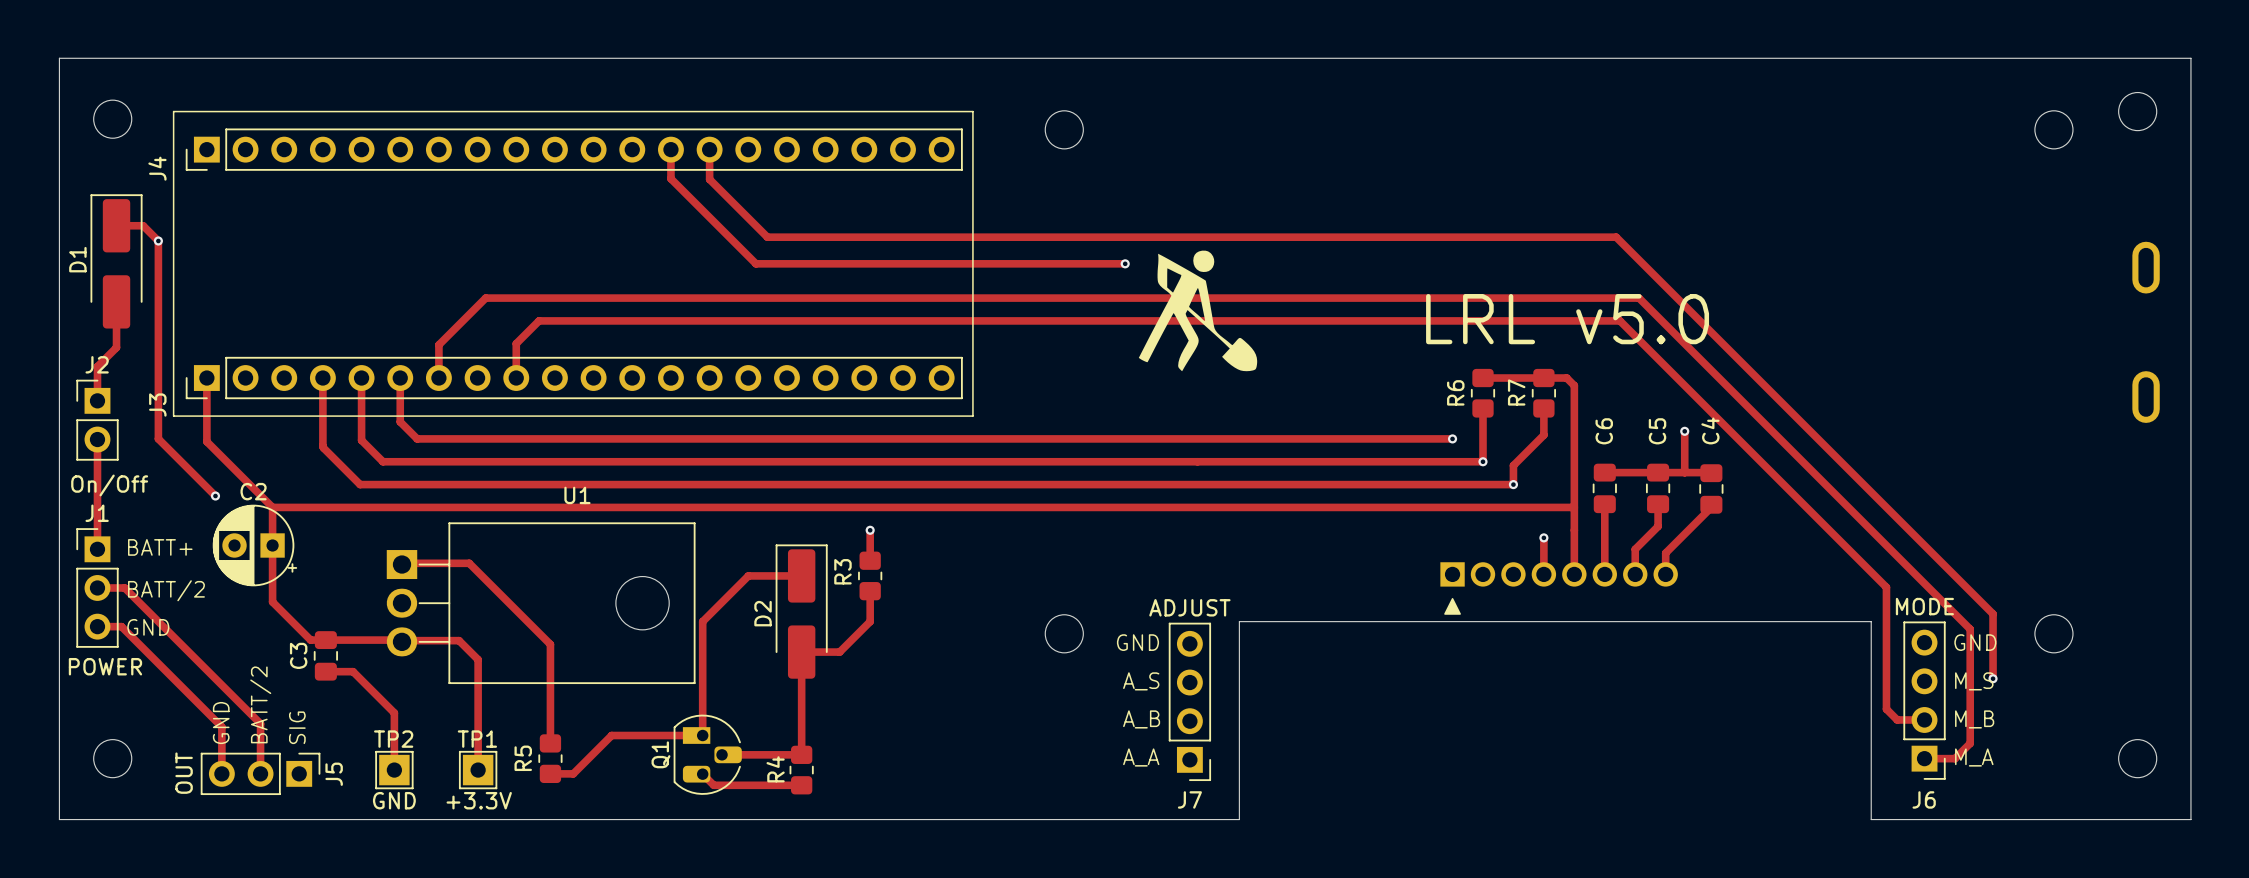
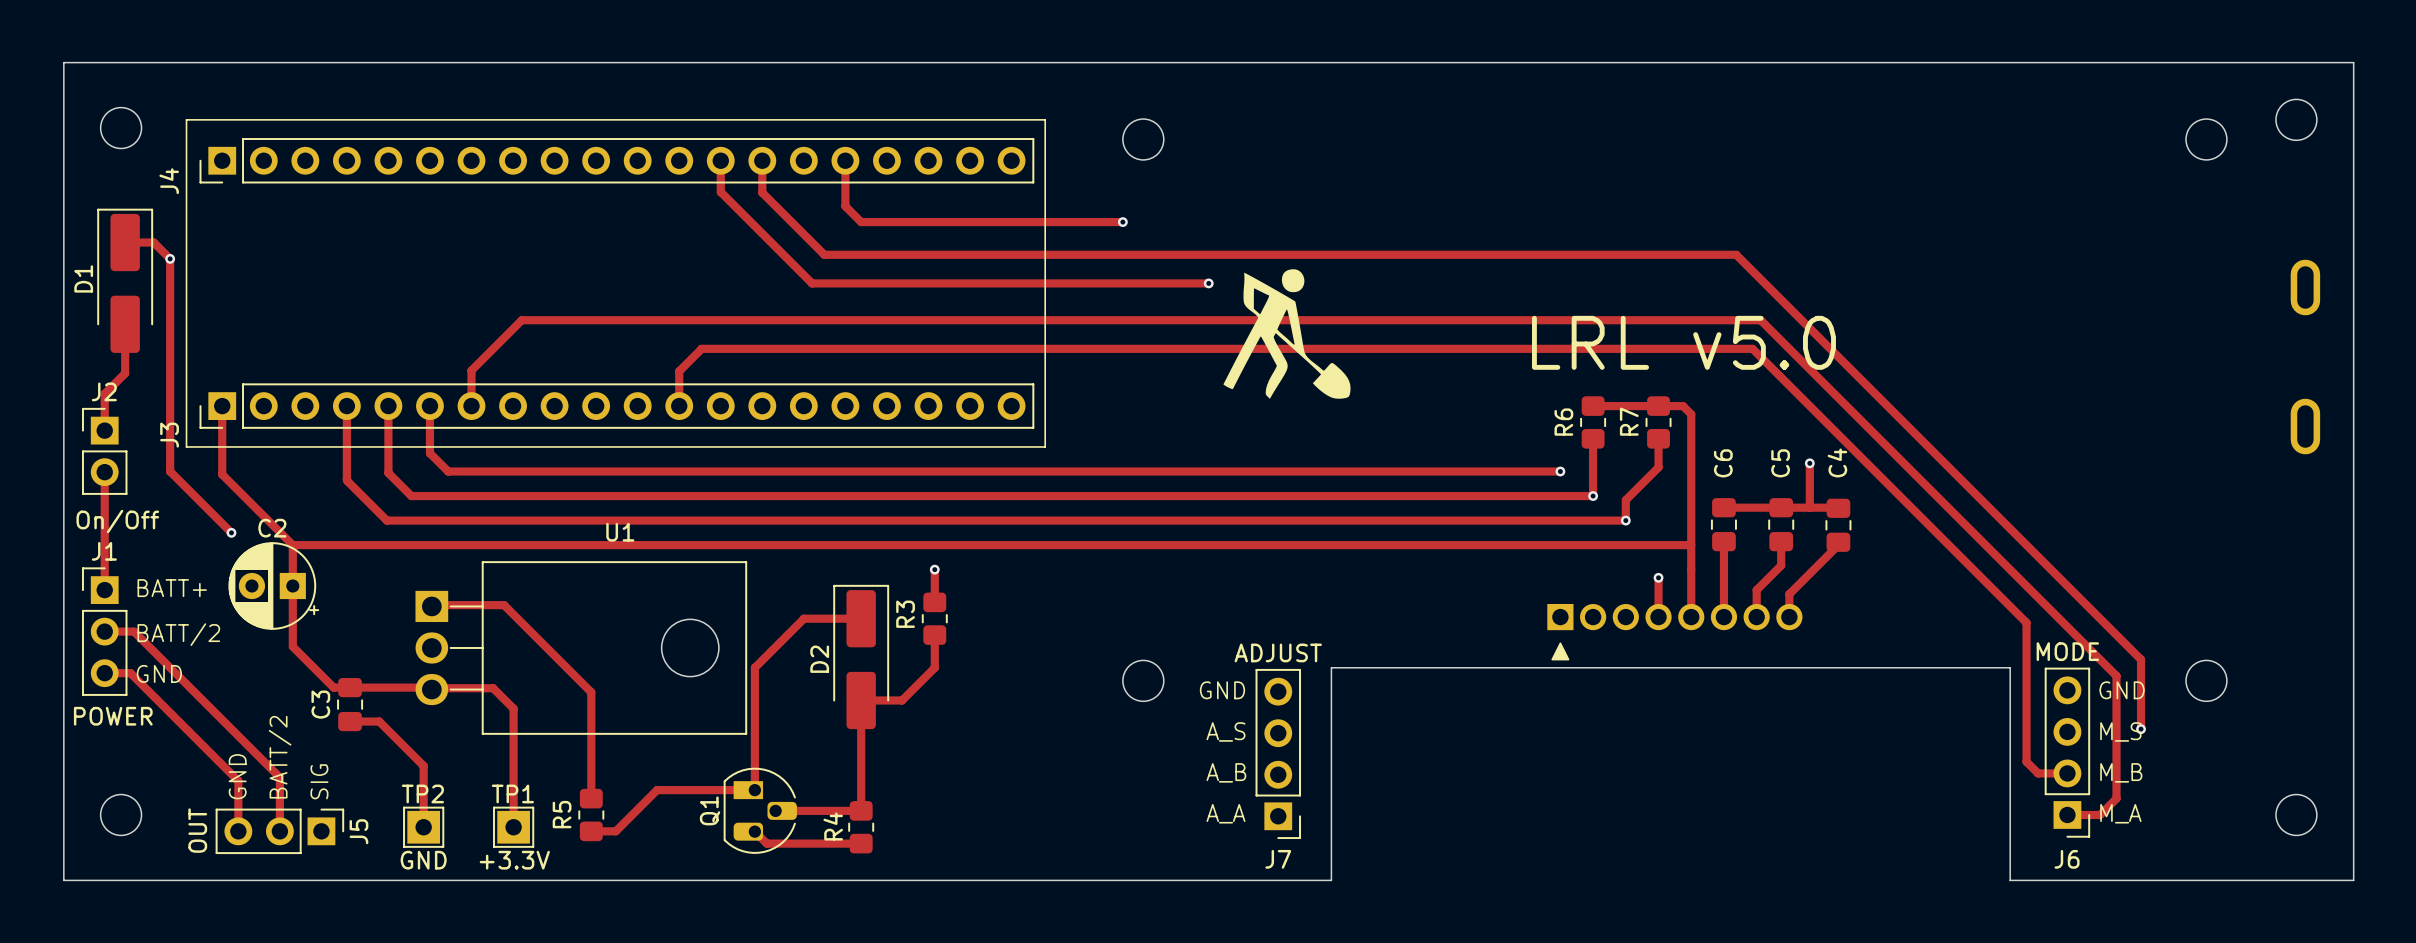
track: none -> (845, 160) (845, 206) (861, 222) (1122, 222)
via: none -> (1122, 222)
track: (516, 378) (516, 343) (539, 320) (1620, 320) (1886, 587) -> (679, 406) (679, 371) (701, 348) (1752, 348) (2026, 622) (2026, 630)

